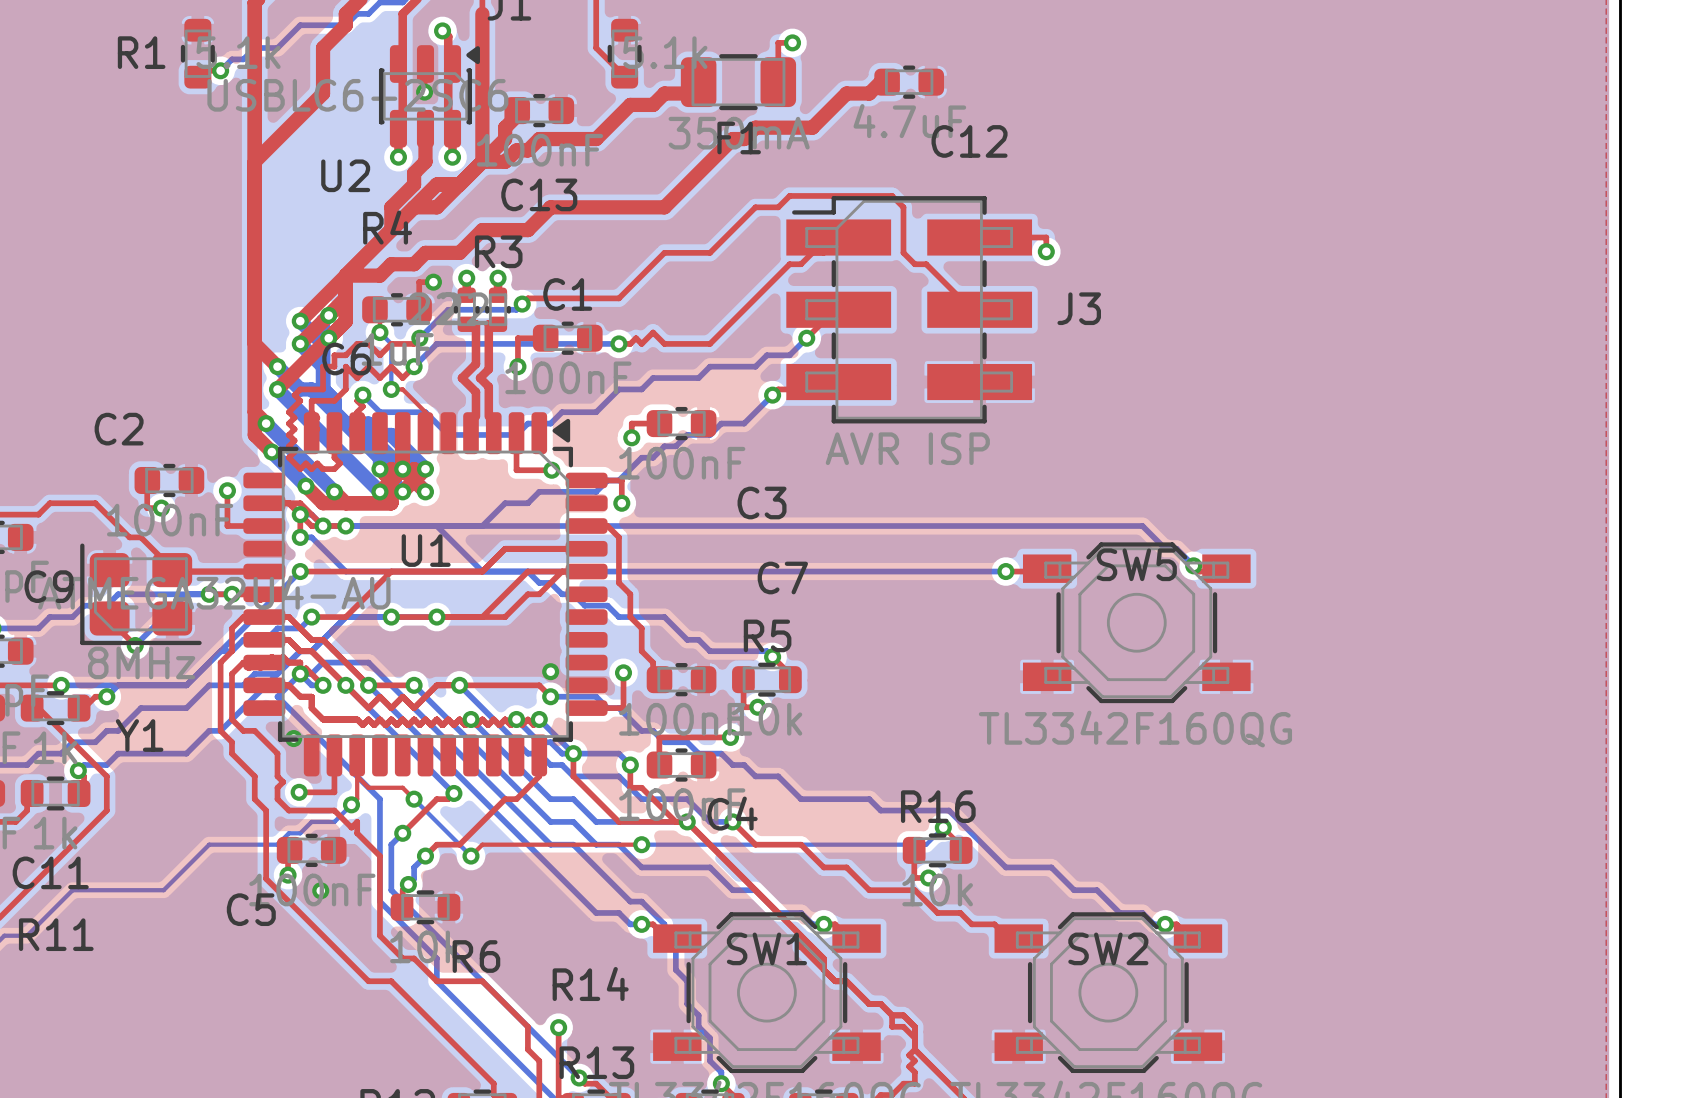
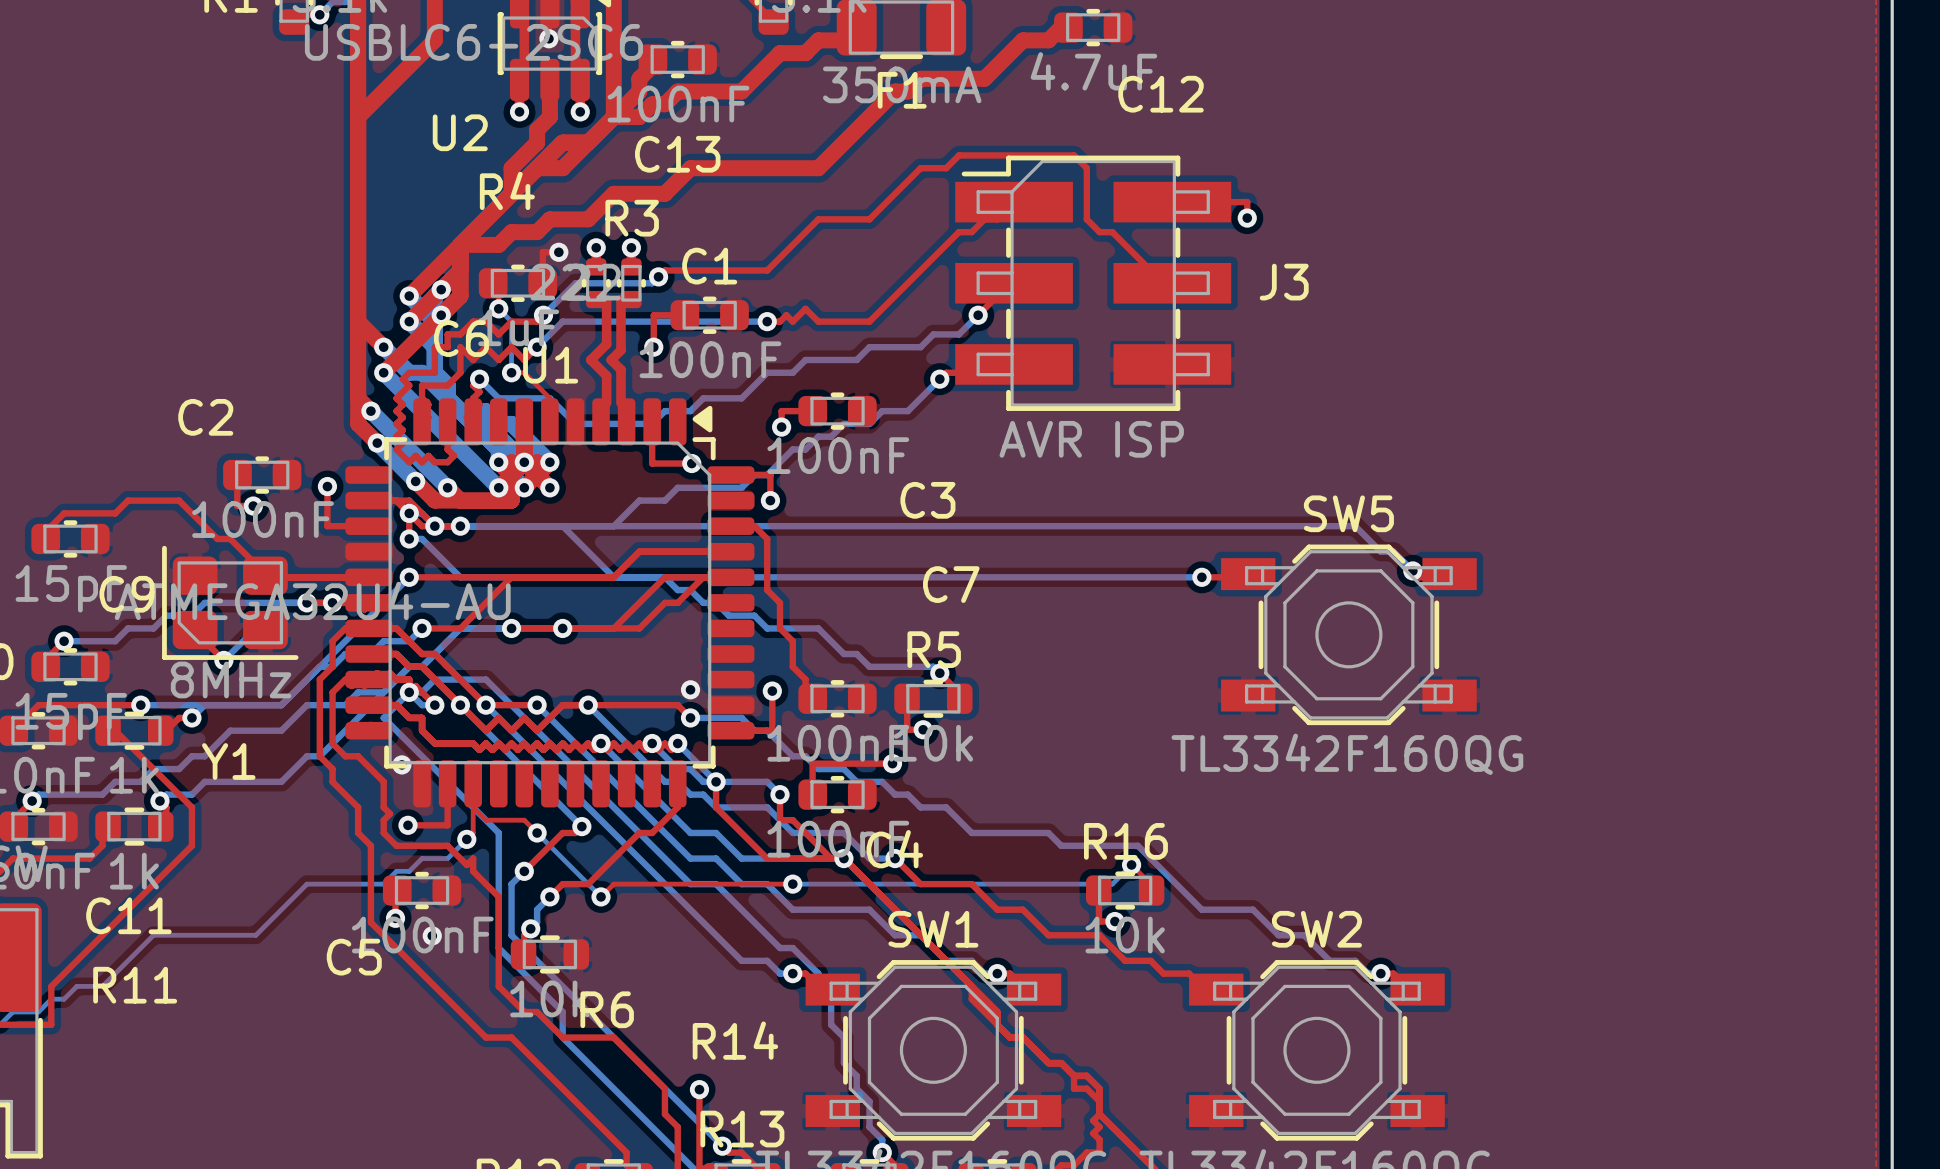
U1 name position: U1 (426, 550) -> U1 (550, 365)
SW5 name position: SW5 (1136, 564) -> SW5 (1348, 513)
SW1 name position: SW1 (766, 948) -> SW1 (933, 929)
SW2 name position: SW2 (1108, 948) -> SW2 (1316, 929)

